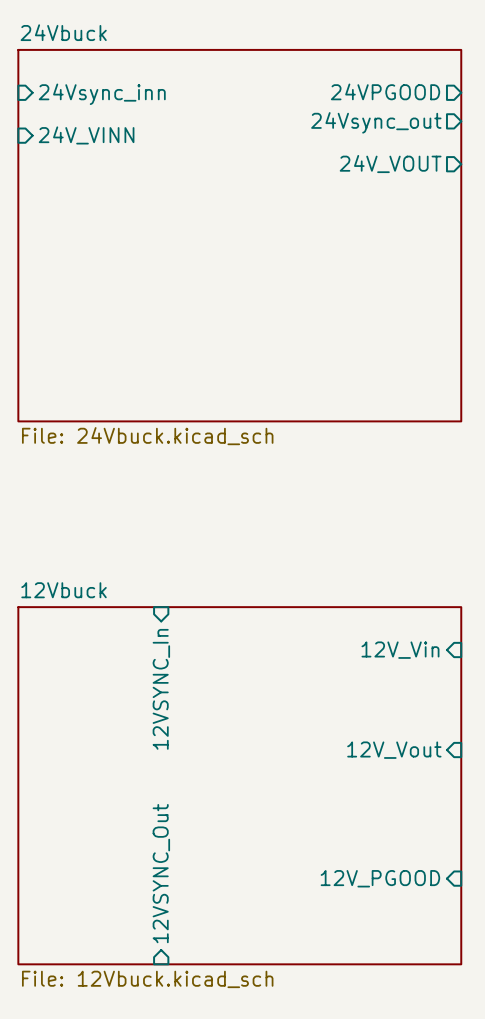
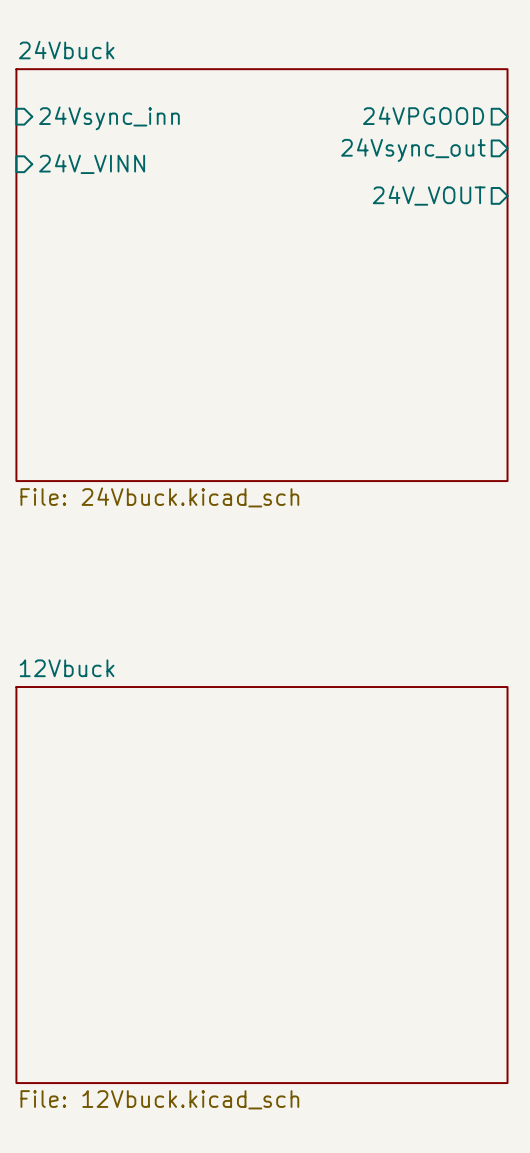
sheet pin: 12V_Vin (400, 650) -> none
sheet pin: 12VSYNC_In (161, 689) -> none
sheet pin: 12V_Vout (394, 750) -> none
sheet pin: 12VSYNC_Out (161, 873) -> none
sheet pin: 12V_PGOOD (380, 878) -> none

